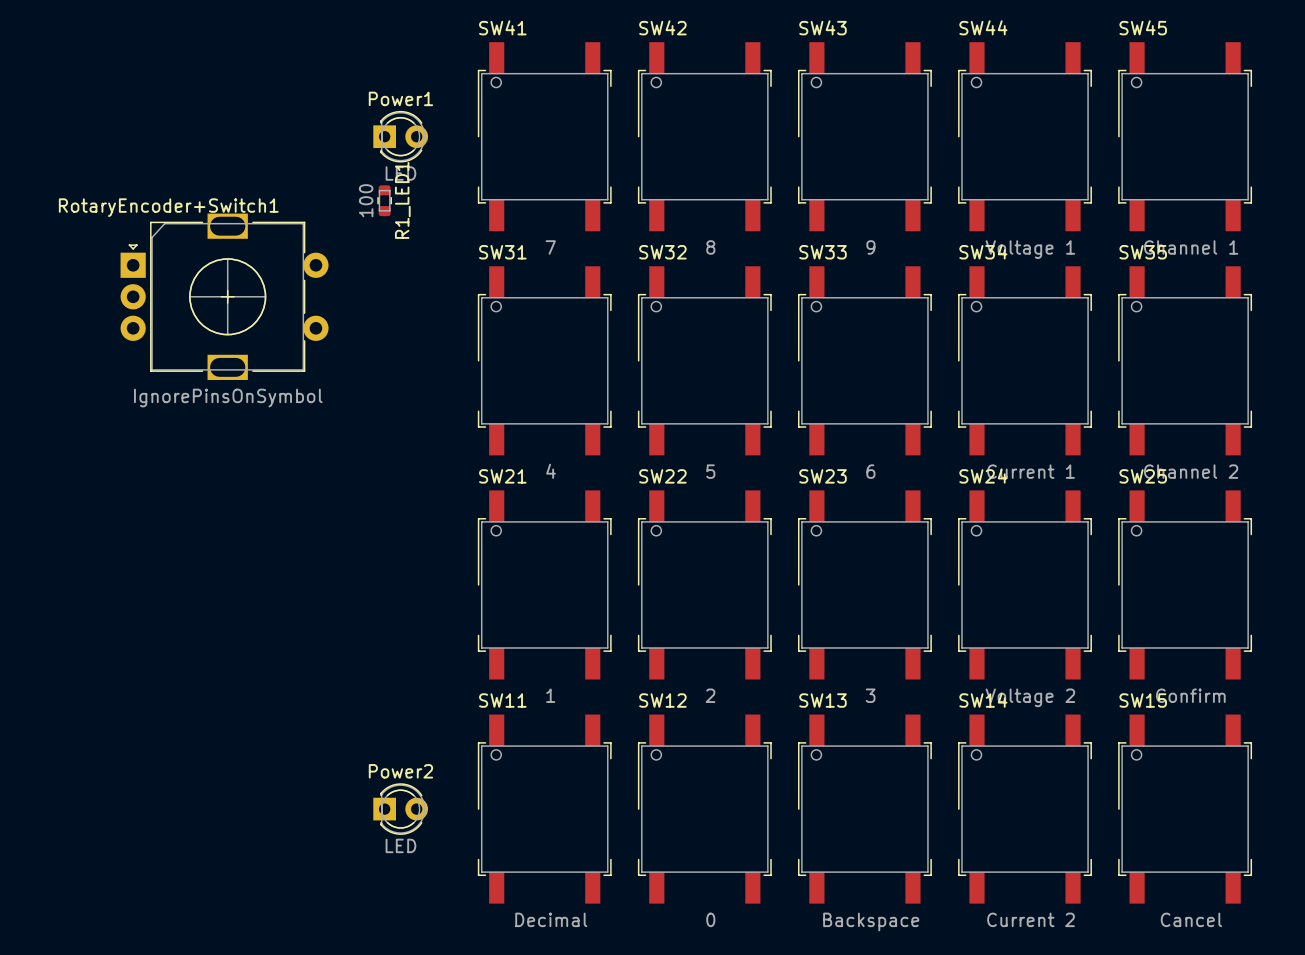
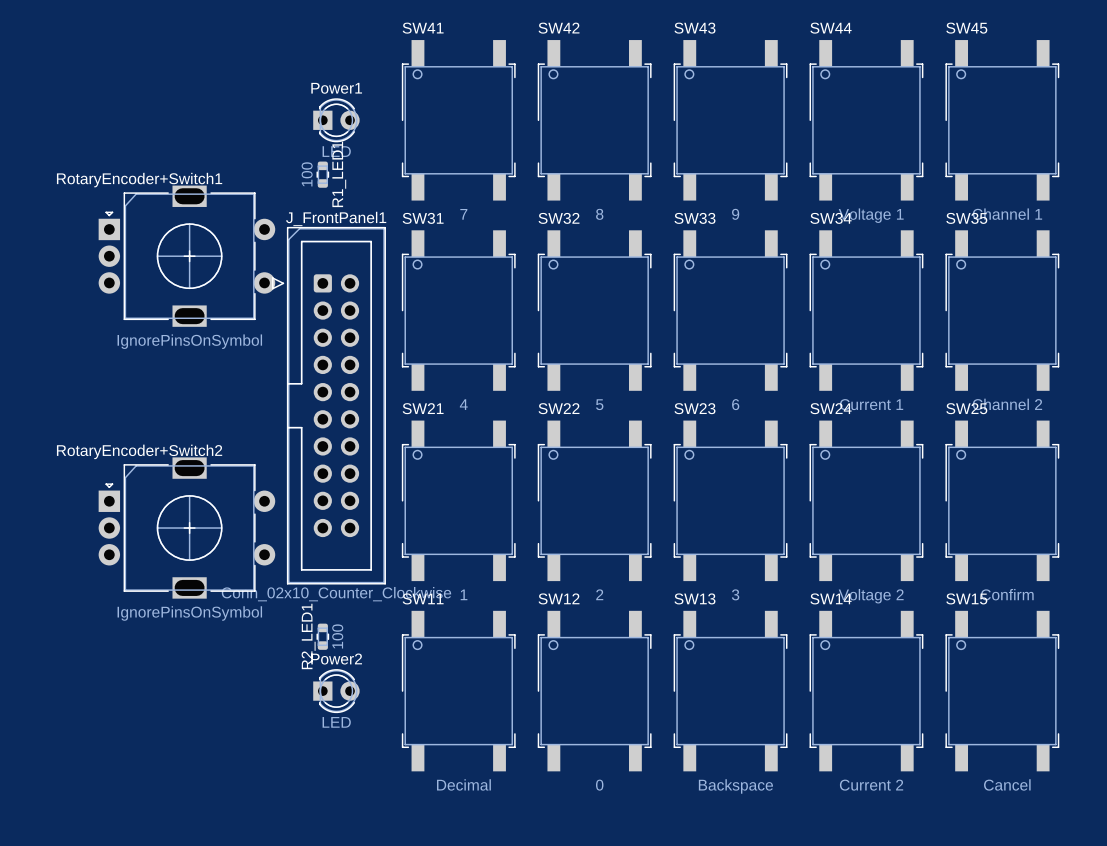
J_FrontPanel1: none -> Conn_02x10_Counter_Clockwise (328, 405)
RotaryEncoder+Switch2: none -> IgnorePinsOnSymbol (186, 528)
R2_LED1: none -> 100 (322, 636)

